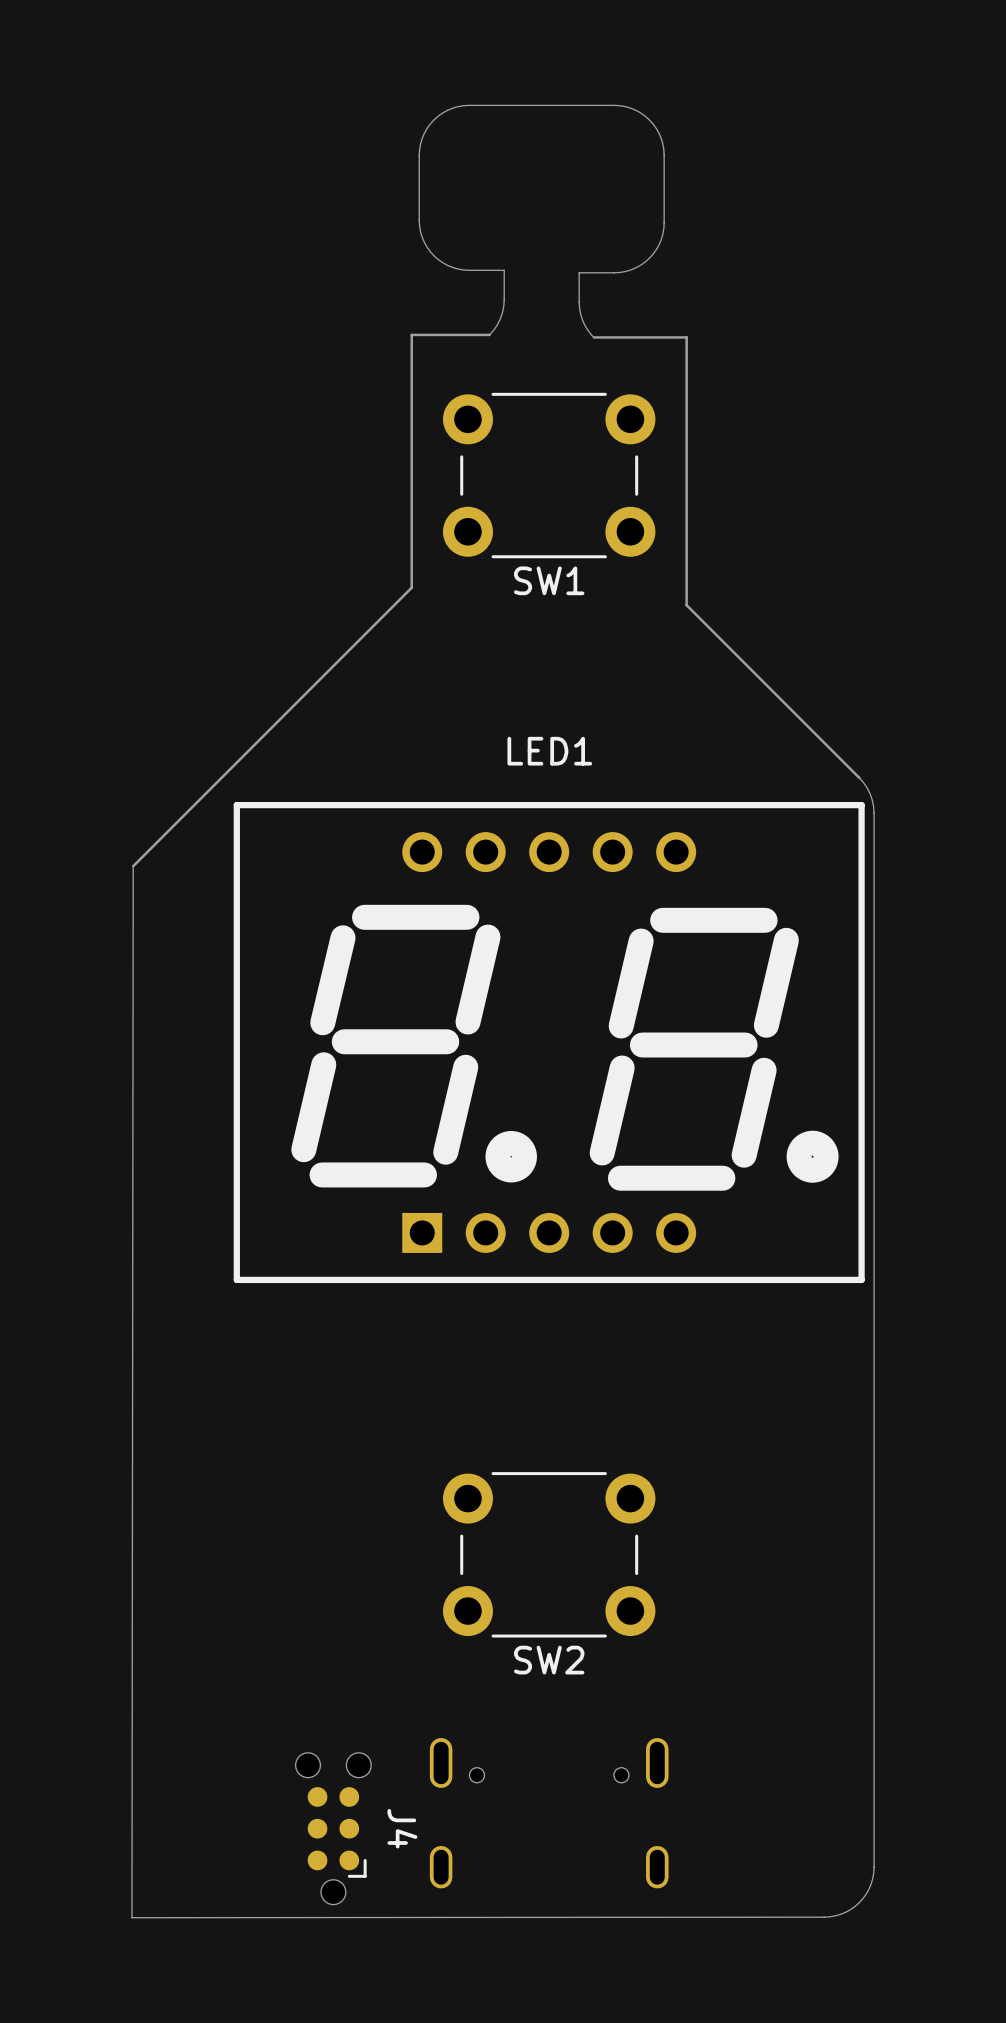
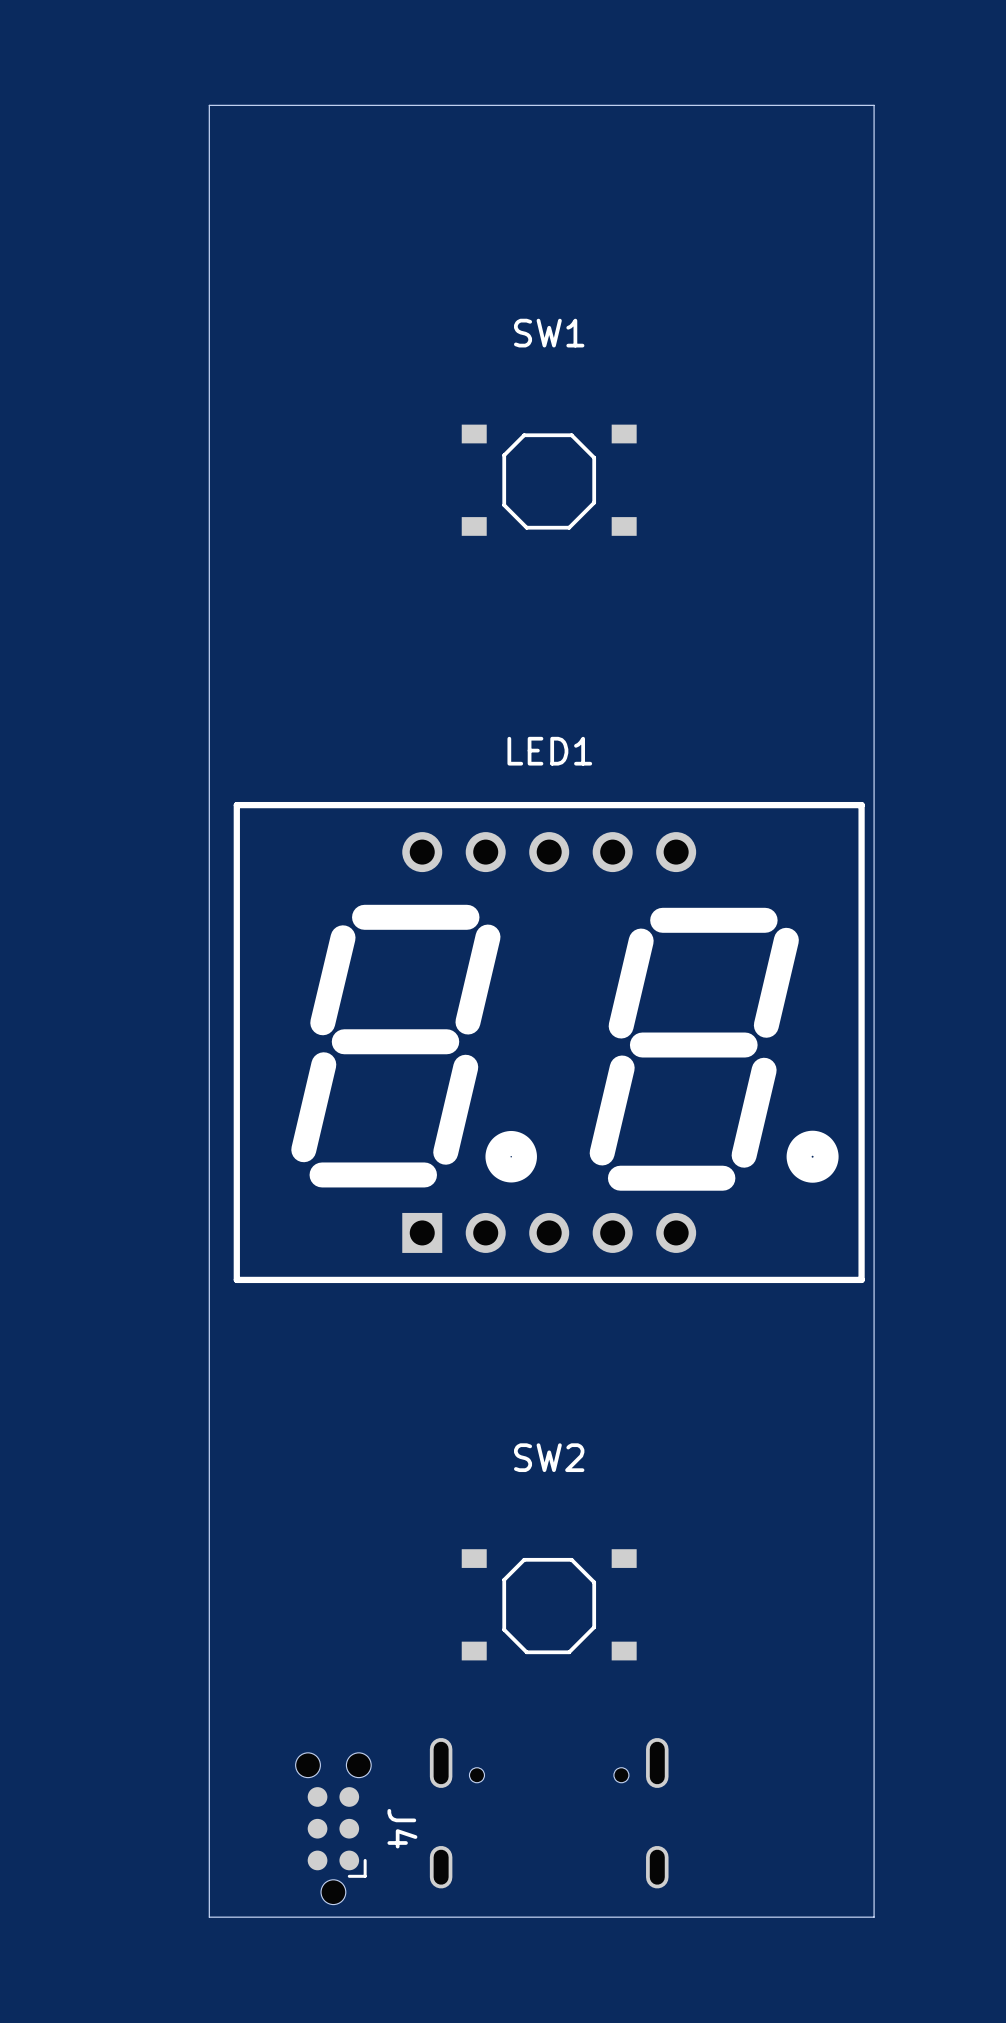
board edge: (469, 105) (452, 108) (438, 116) (426, 128) (422, 138) (419, 155) (420, 231) (430, 251) (447, 265) (463, 270) (504, 270) (503, 306) (497, 324) (489, 334) (411, 334) (411, 587) (133, 866) (131, 1917) (829, 1916) (845, 1912) (859, 1902) (869, 1888) (874, 1867) -> (469, 105) (209, 105) (209, 1917) (874, 1917) (874, 1867)
board edge: (614, 105) (630, 108) (645, 116) (653, 124) (661, 138) (664, 155) (662, 233) (653, 253) (635, 267) (619, 272) (579, 272) (579, 306) (582, 321) (593, 337) (686, 337) (686, 605) (859, 777) (870, 794) (874, 813) -> (614, 105) (874, 105) (874, 813)
SW1 footprint: [442, 392, 656, 559] -> [461, 424, 637, 536]
SW1 name position: SW1 (549, 580) -> SW1 (549, 333)
SW2 footprint: [442, 1472, 656, 1638] -> [461, 1549, 637, 1661]
SW2 name position: SW2 (549, 1660) -> SW2 (549, 1457)

